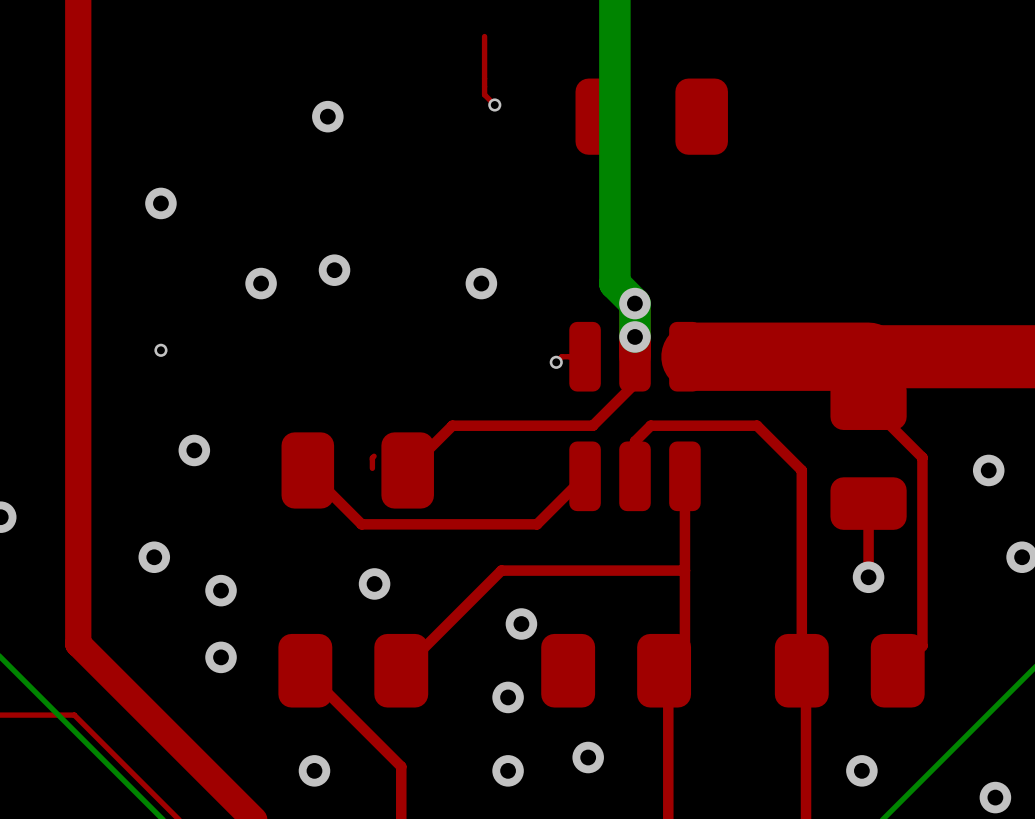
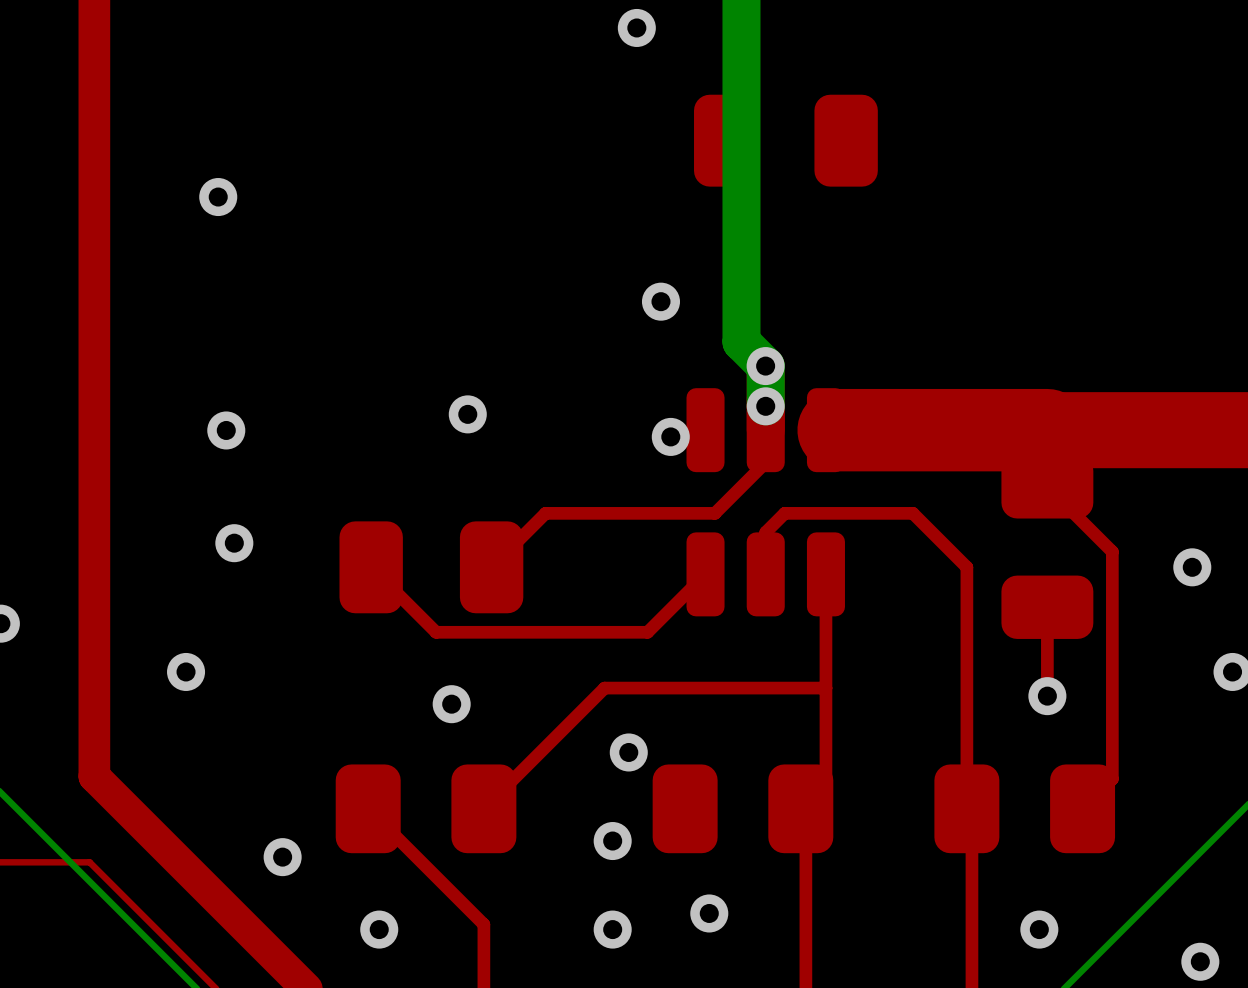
via: none -> (636, 27)
top track: (484, 36) (484, 94) (494, 104) -> none
via: (494, 104) -> none
via: (327, 116) -> none
via position: (160, 203) -> (218, 197)
via: none -> (660, 301)
via: (334, 270) -> none
via: (261, 283) -> none
via: (481, 283) -> none
via: none -> (467, 414)
via: (160, 350) -> none
via size: [549, 355, 563, 369] -> [651, 417, 690, 456]
via: none -> (226, 430)
top track: (374, 456) (372, 468) -> none
via: (221, 590) -> none
via position: (221, 657) -> (282, 857)

